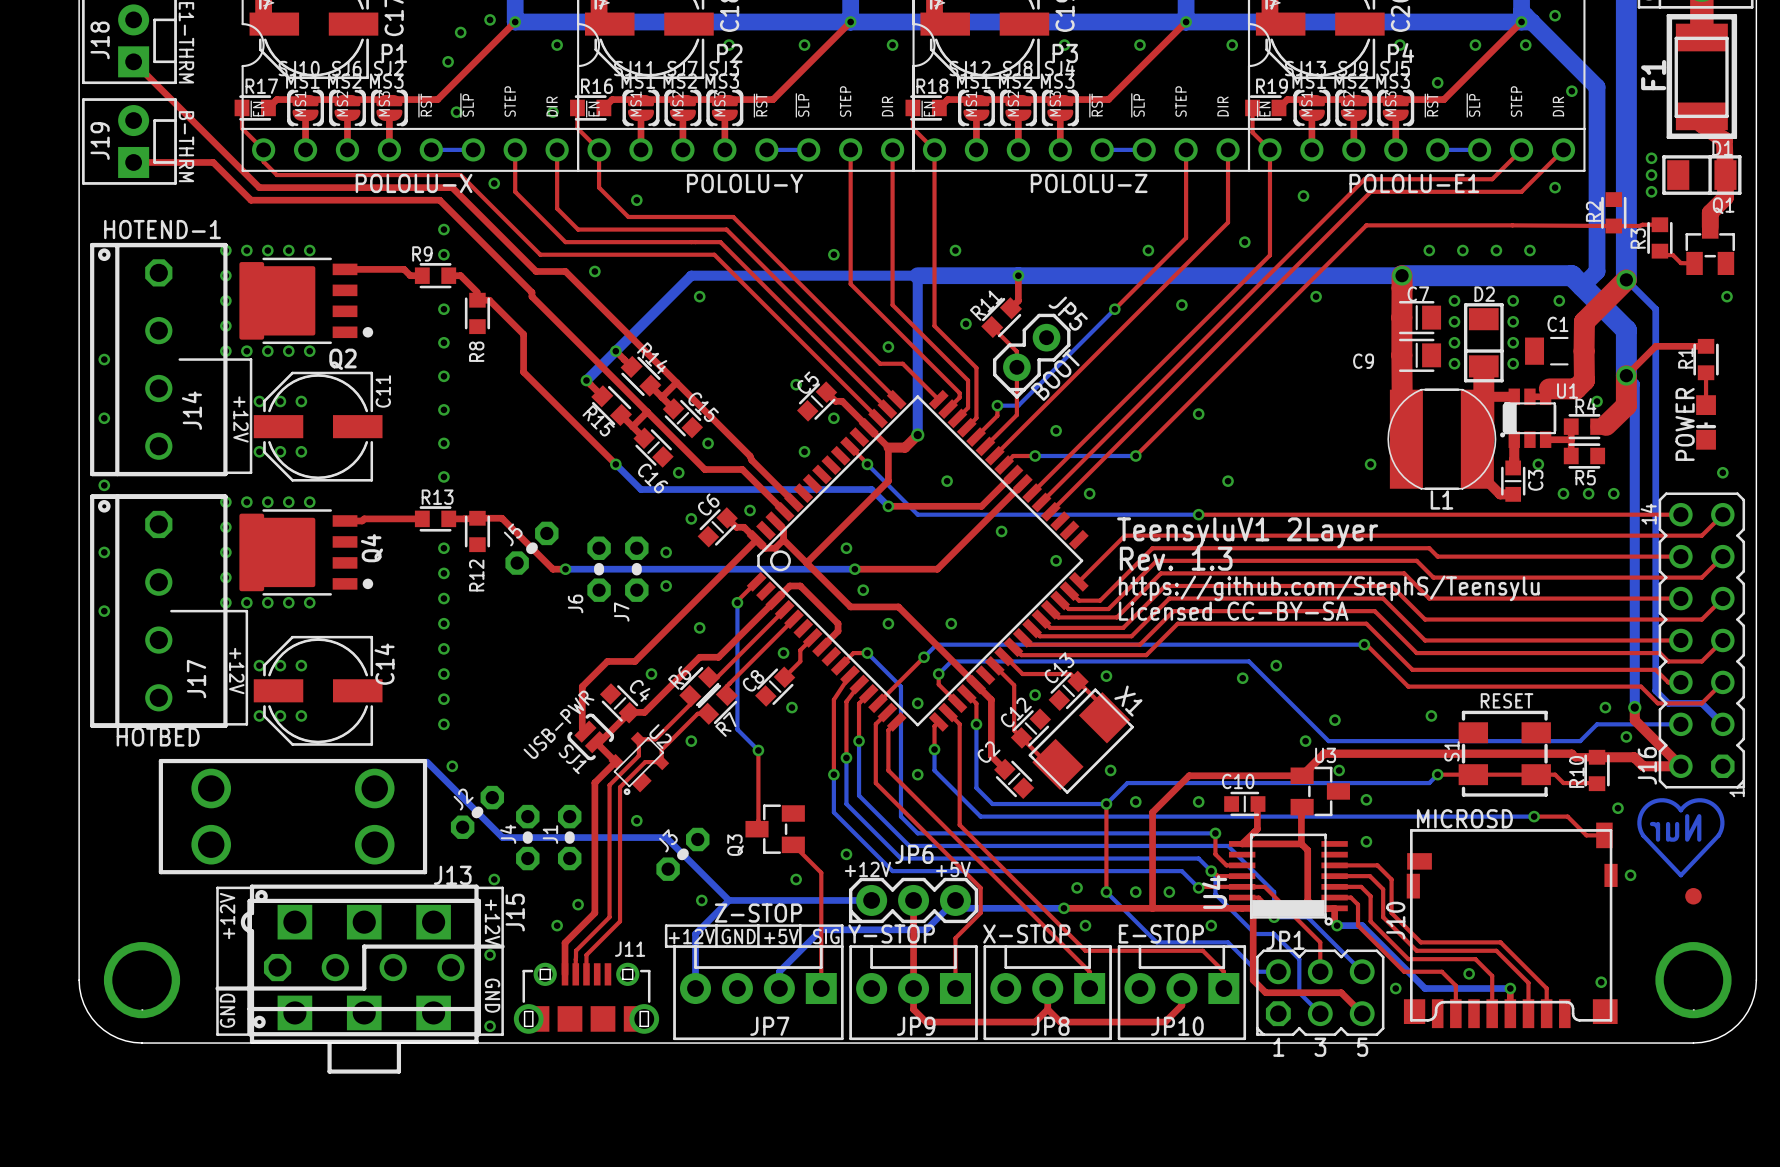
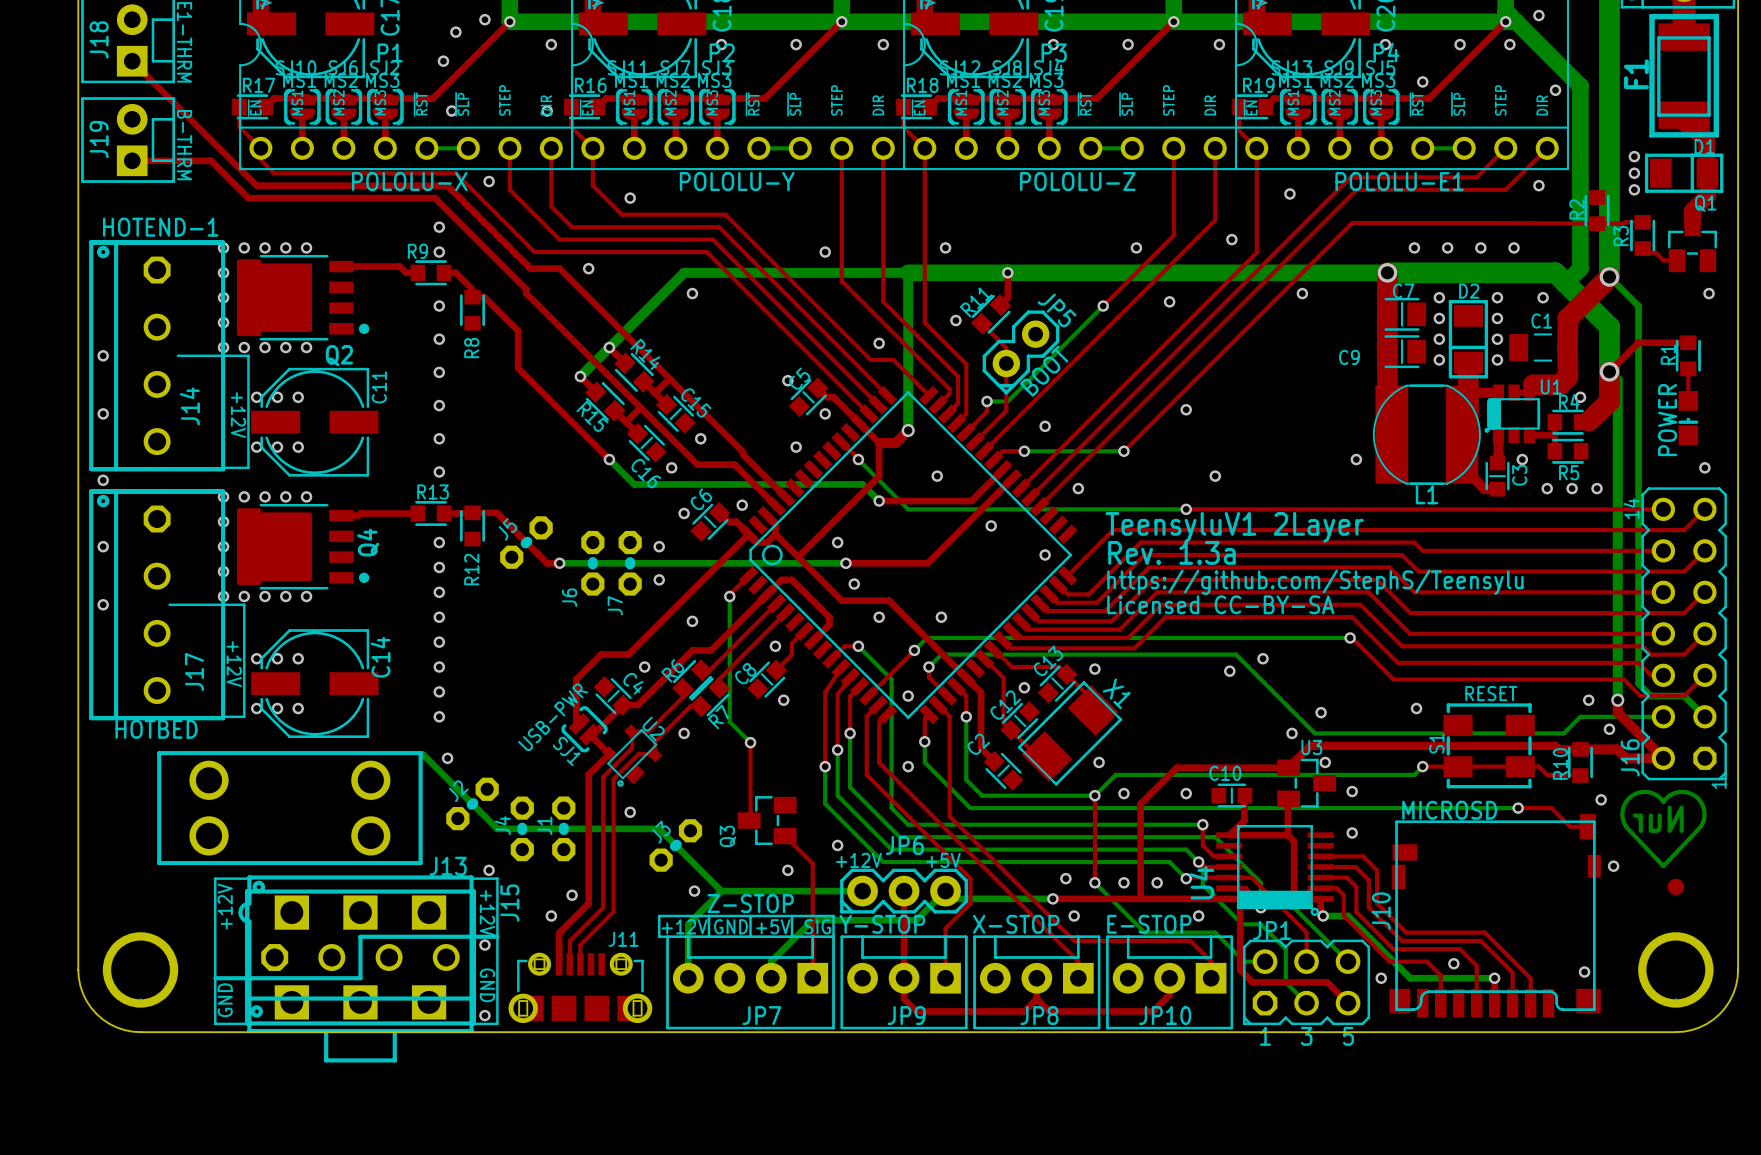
text: Rev. 1.3 (1176, 558) -> Rev. 1.3a (1171, 552)

